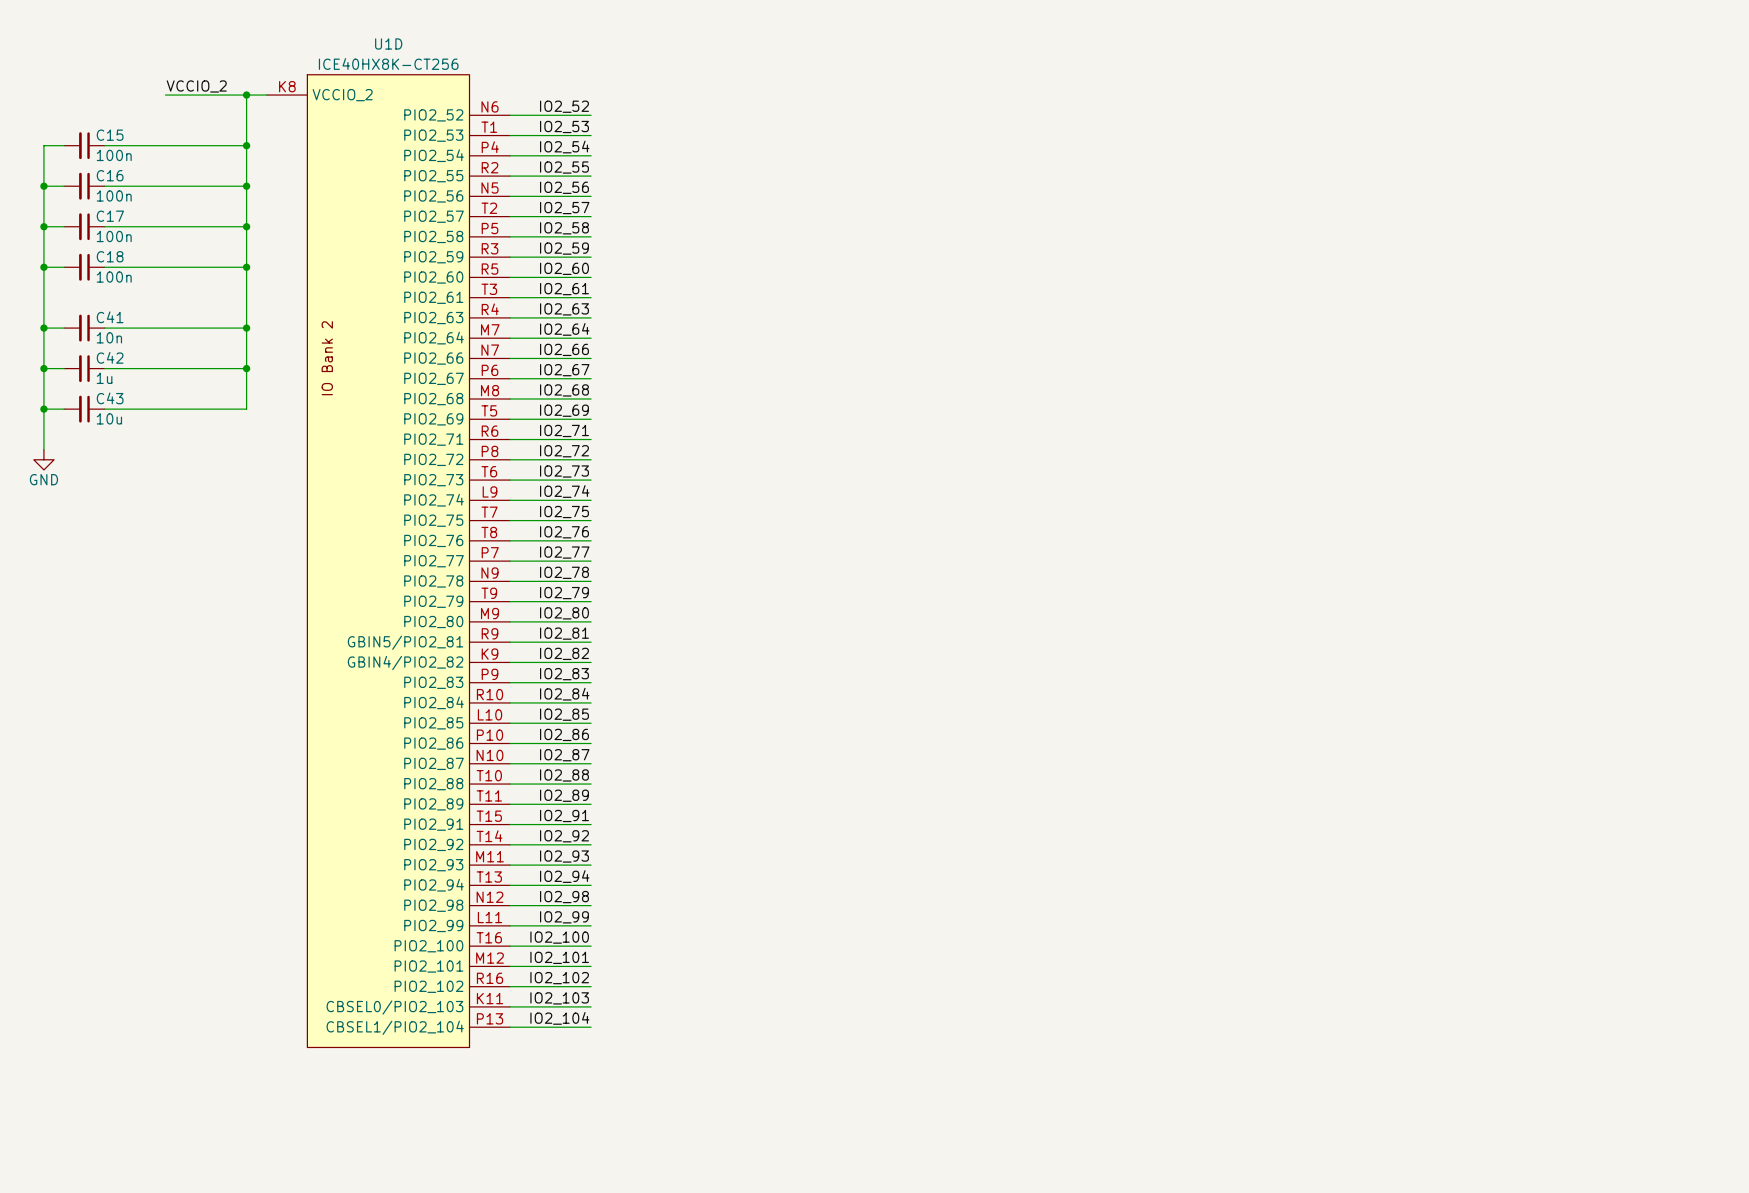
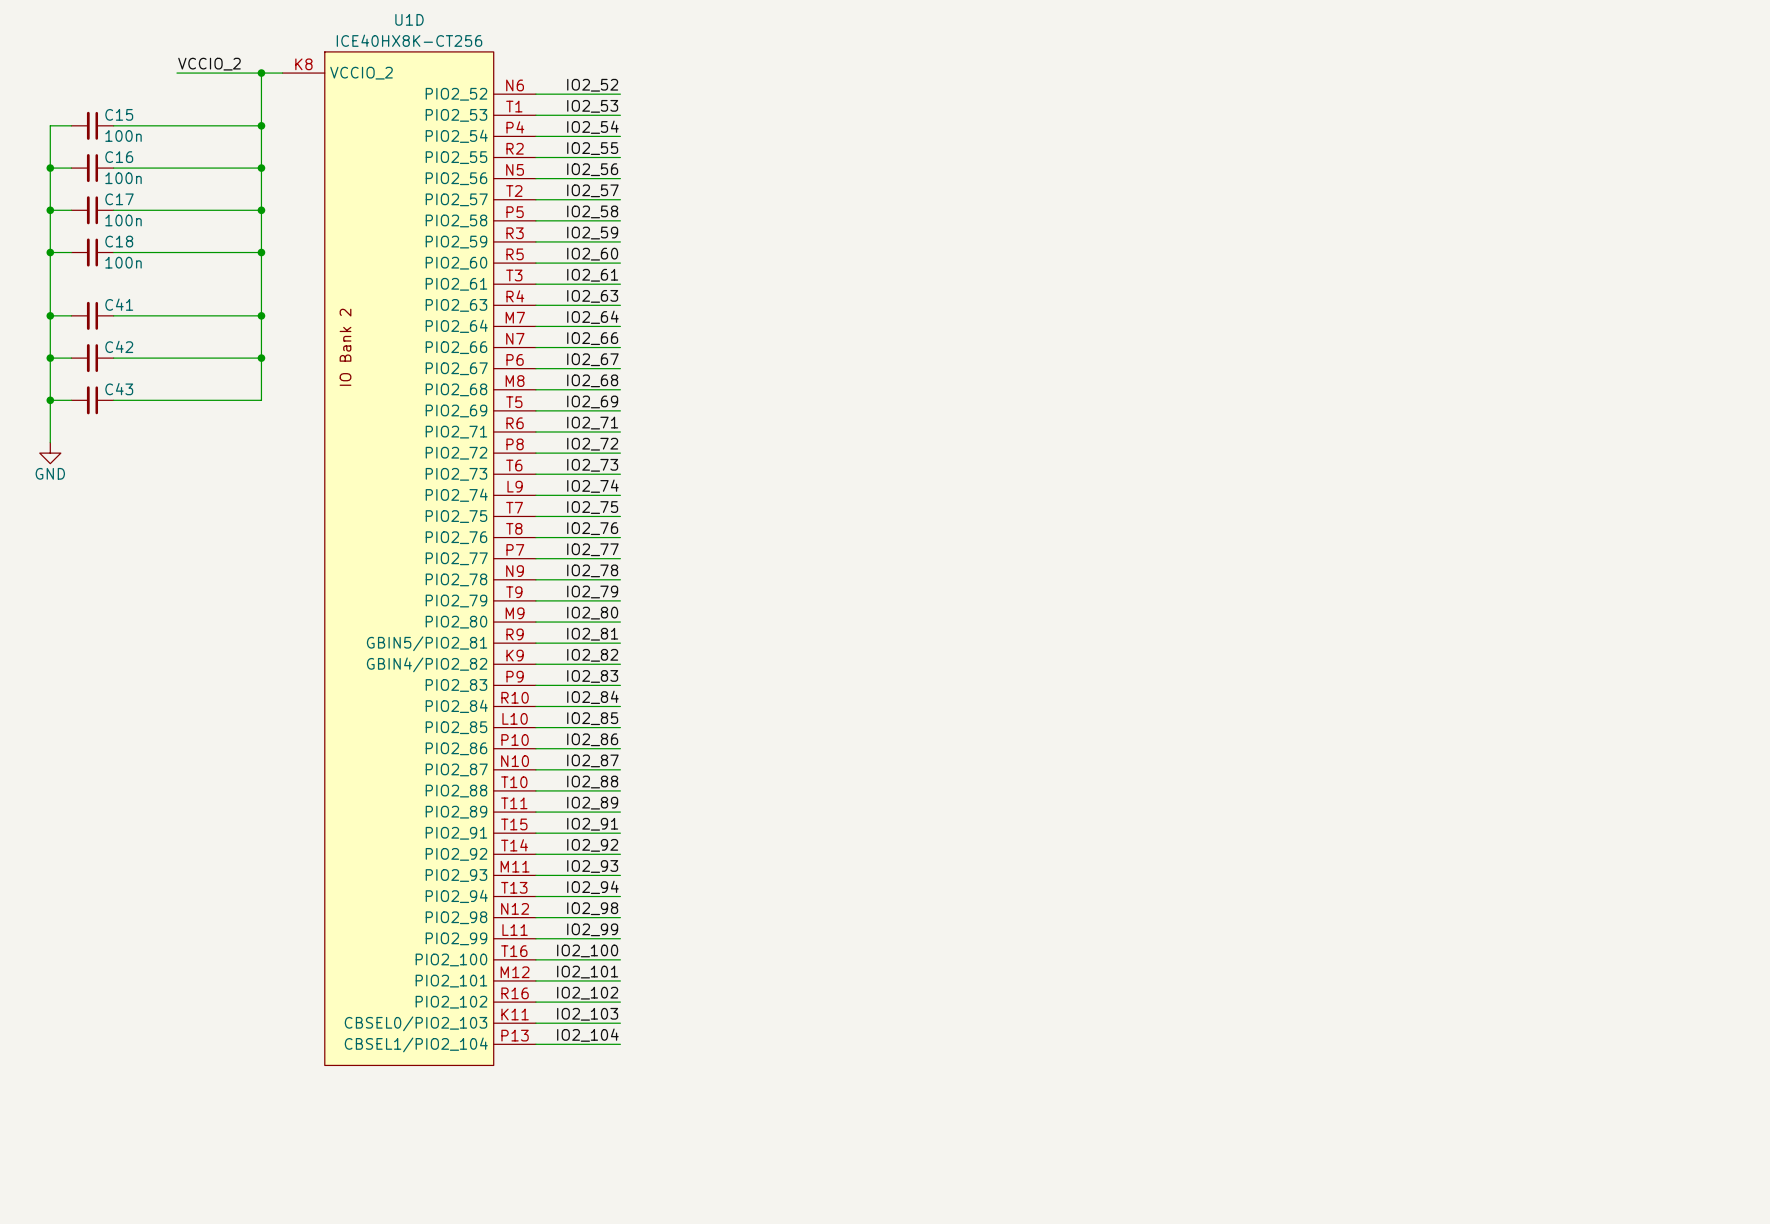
C41 value: 10n (109, 337) -> none
C42 value: 1u (104, 378) -> none
C43 value: 10u (109, 418) -> none

